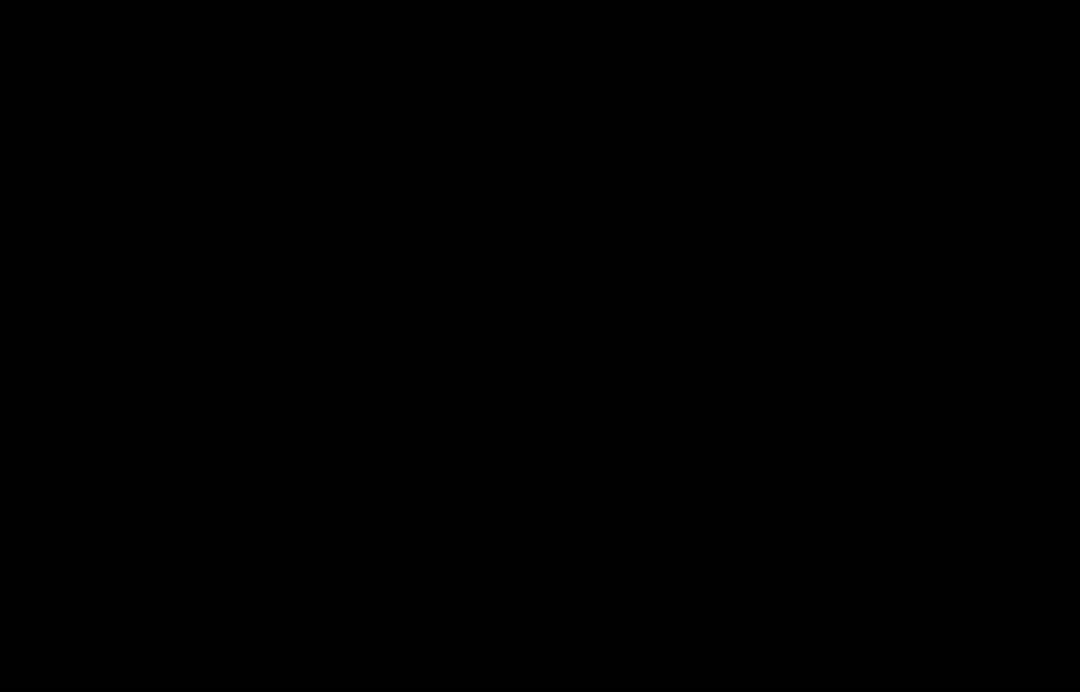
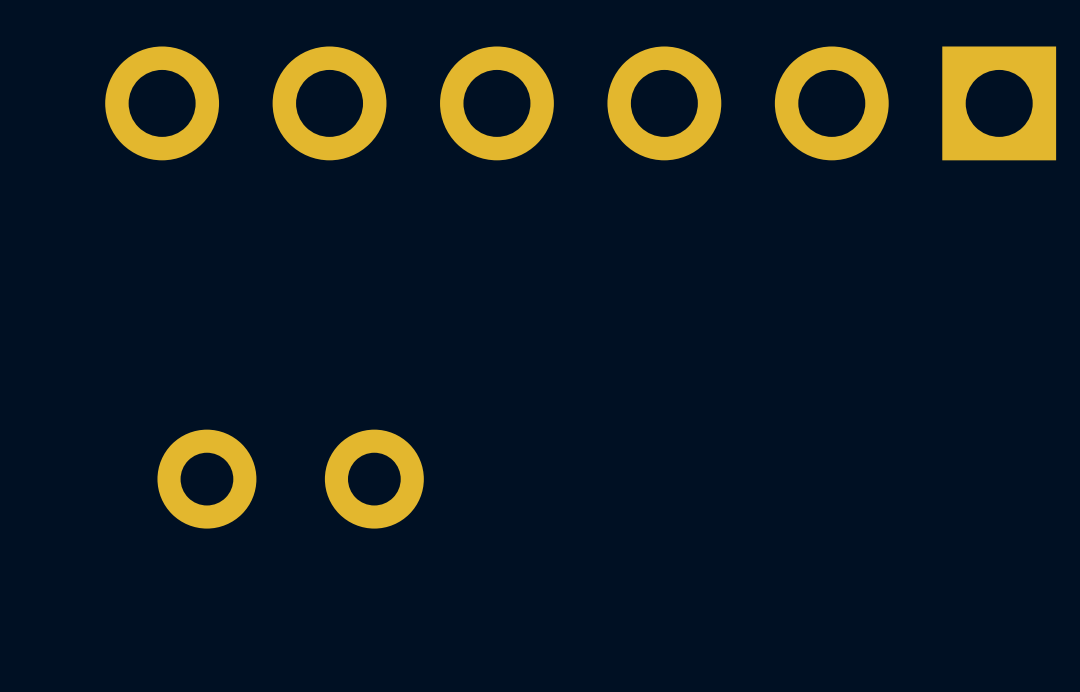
part: none -> (580, 103)
part: none -> (290, 479)

